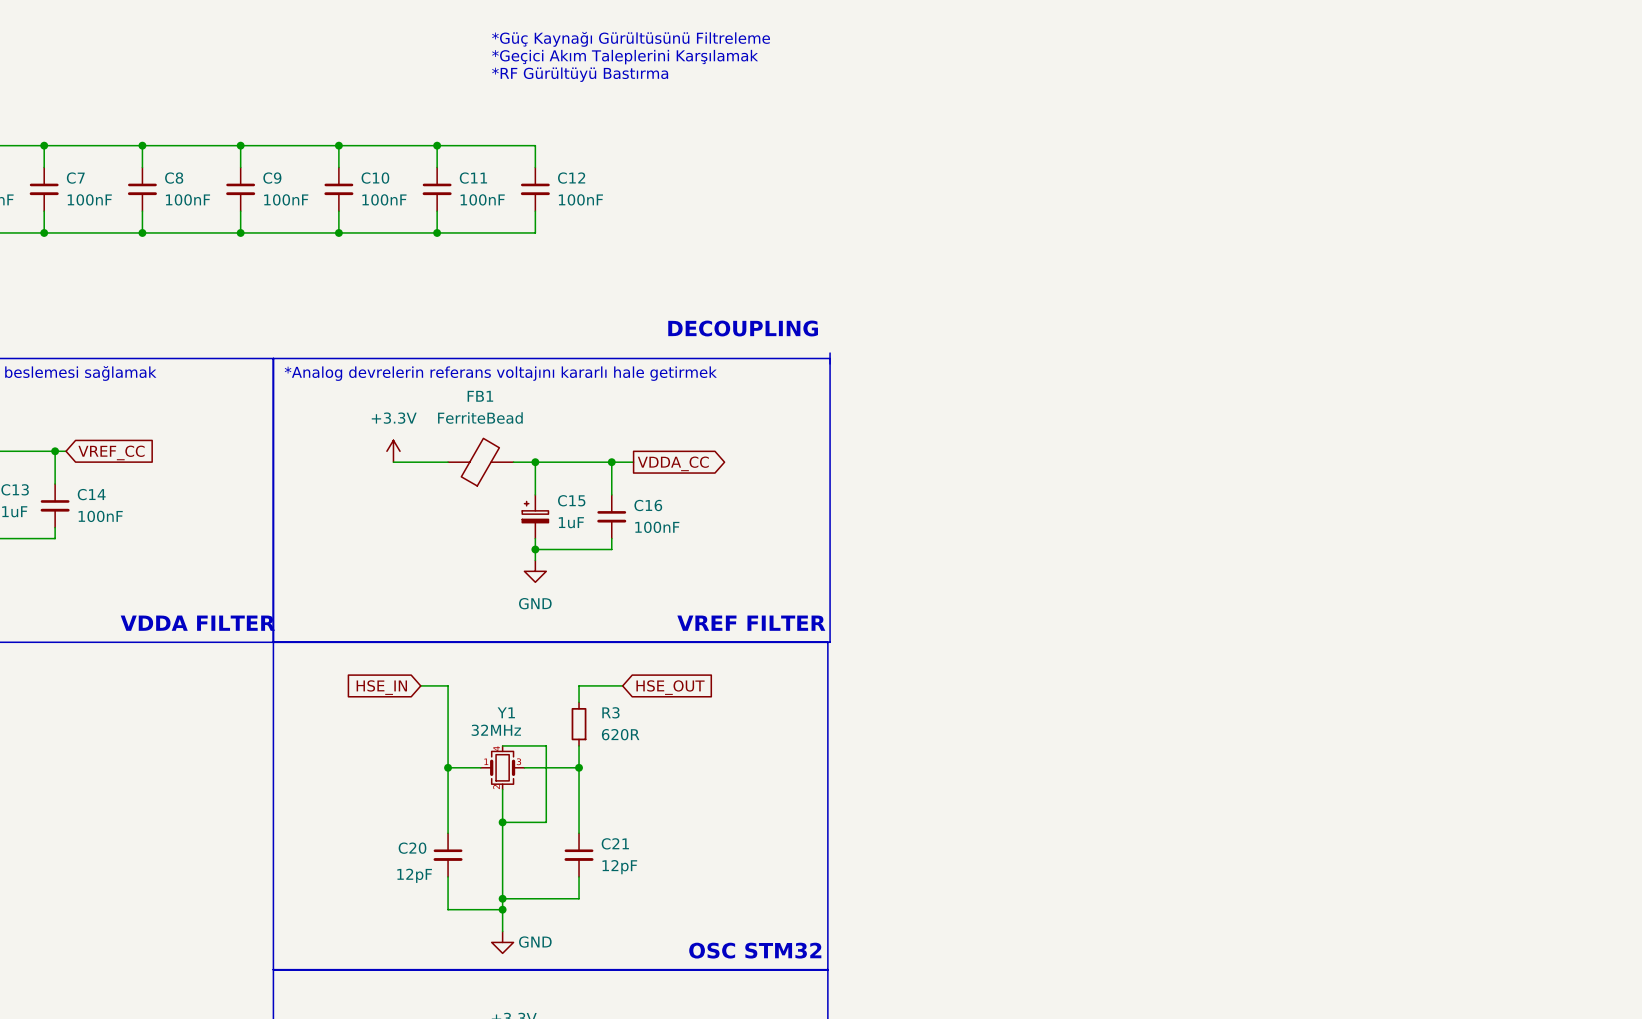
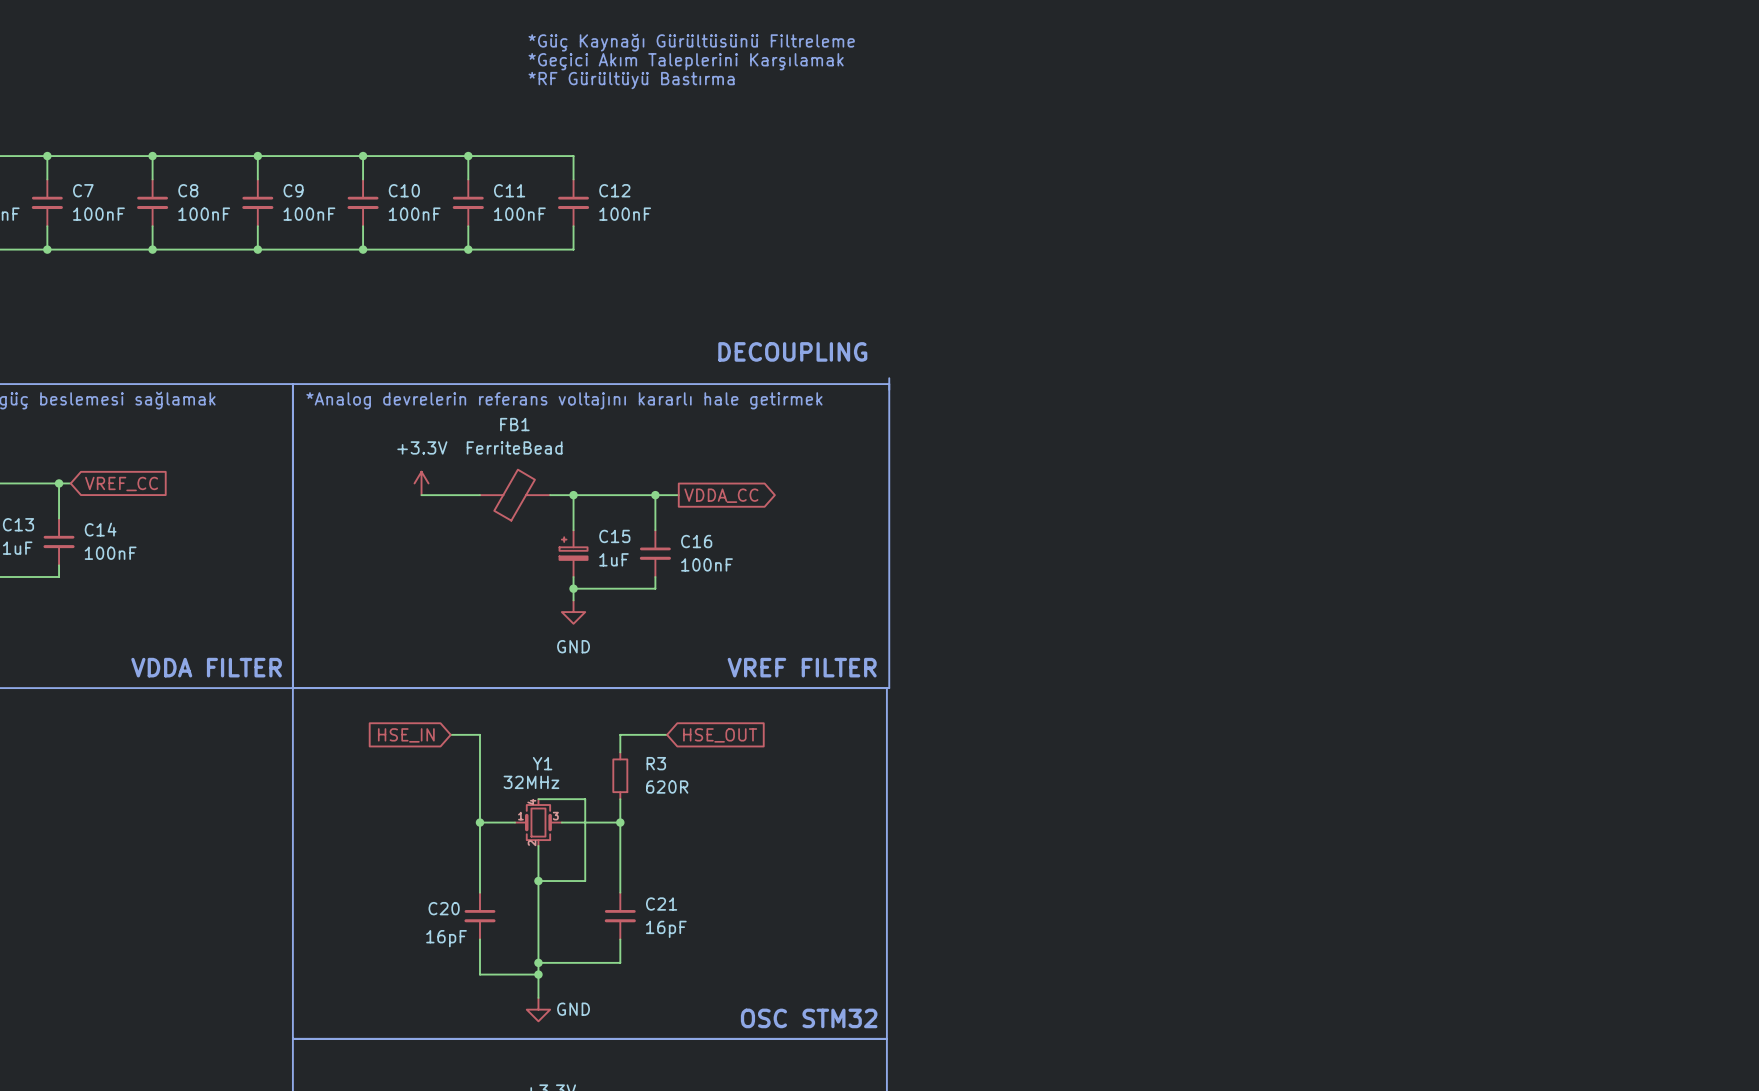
C21 value: 12pF (619, 867) -> 16pF (666, 929)
C20 value: 12pF (414, 875) -> 16pF (446, 938)

